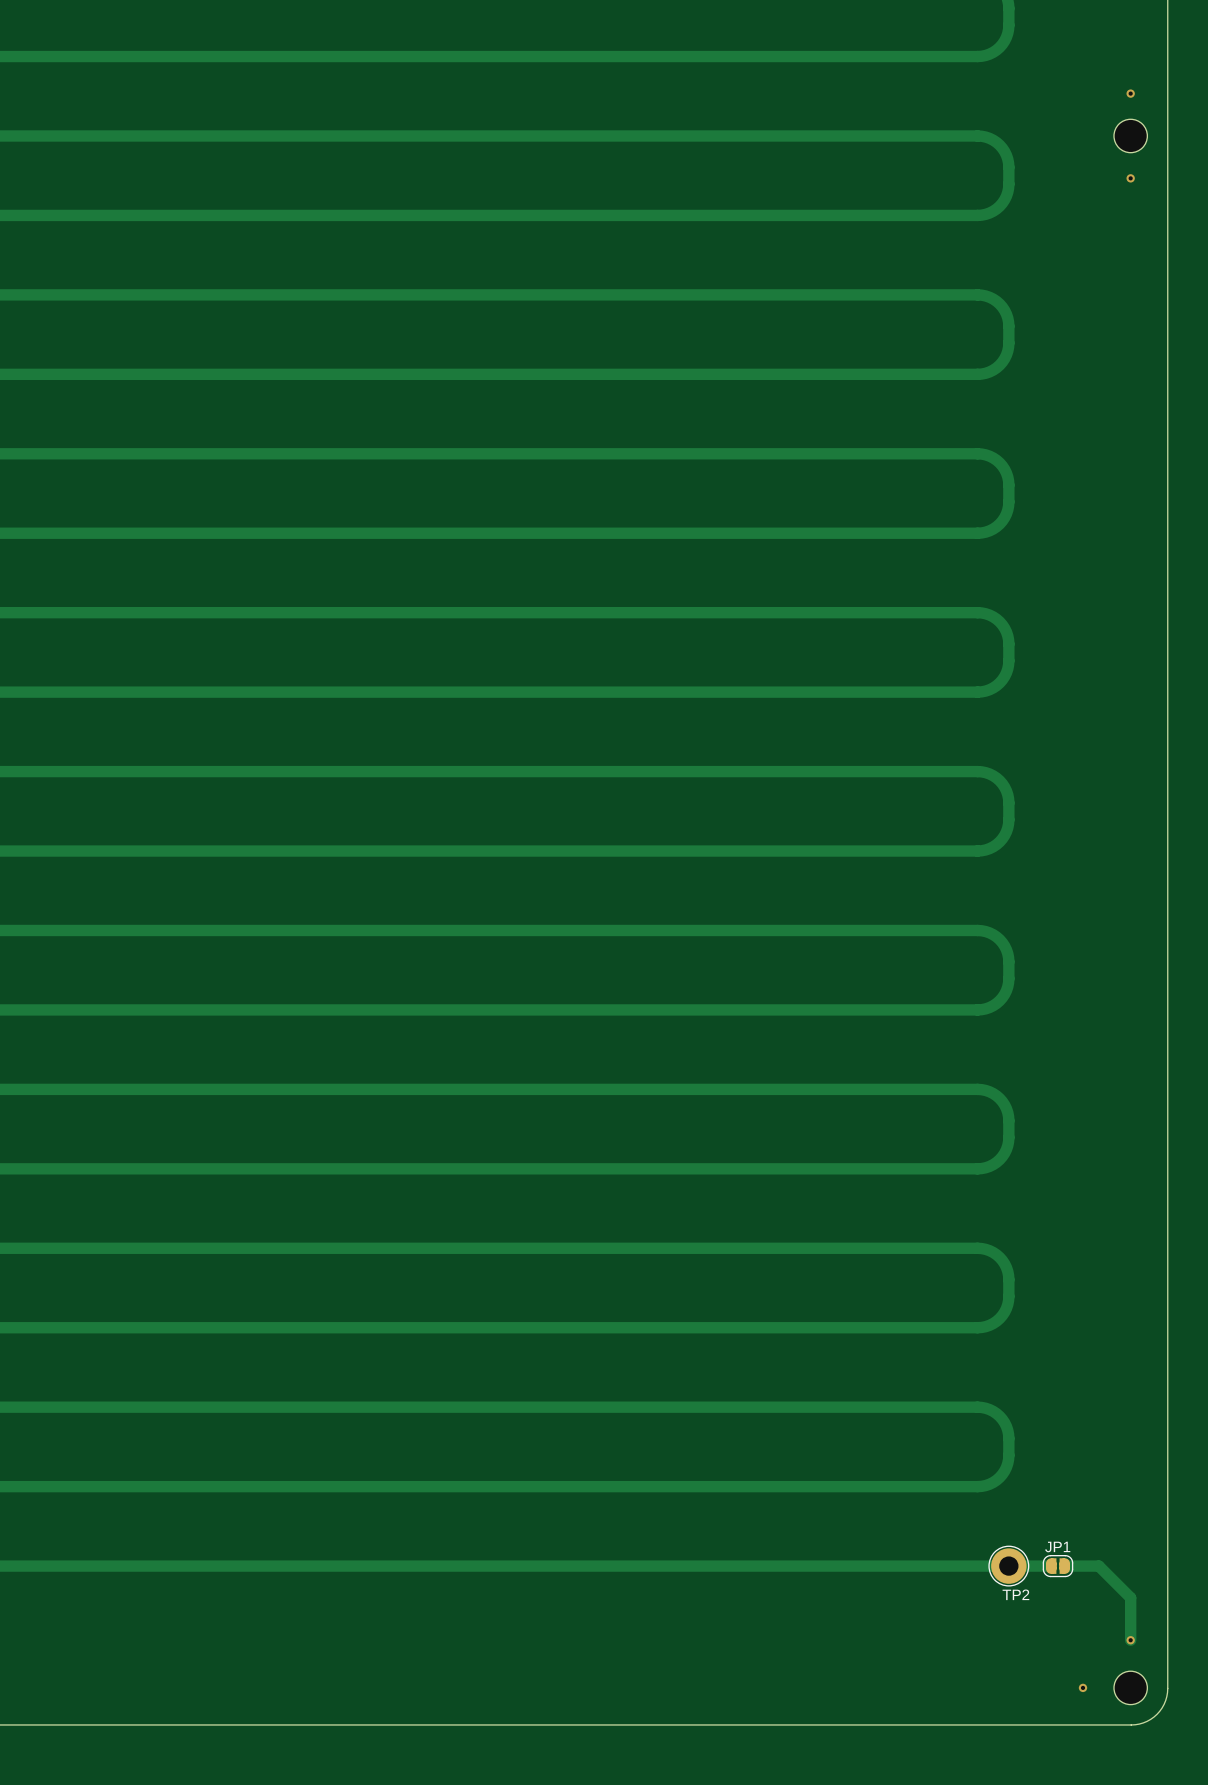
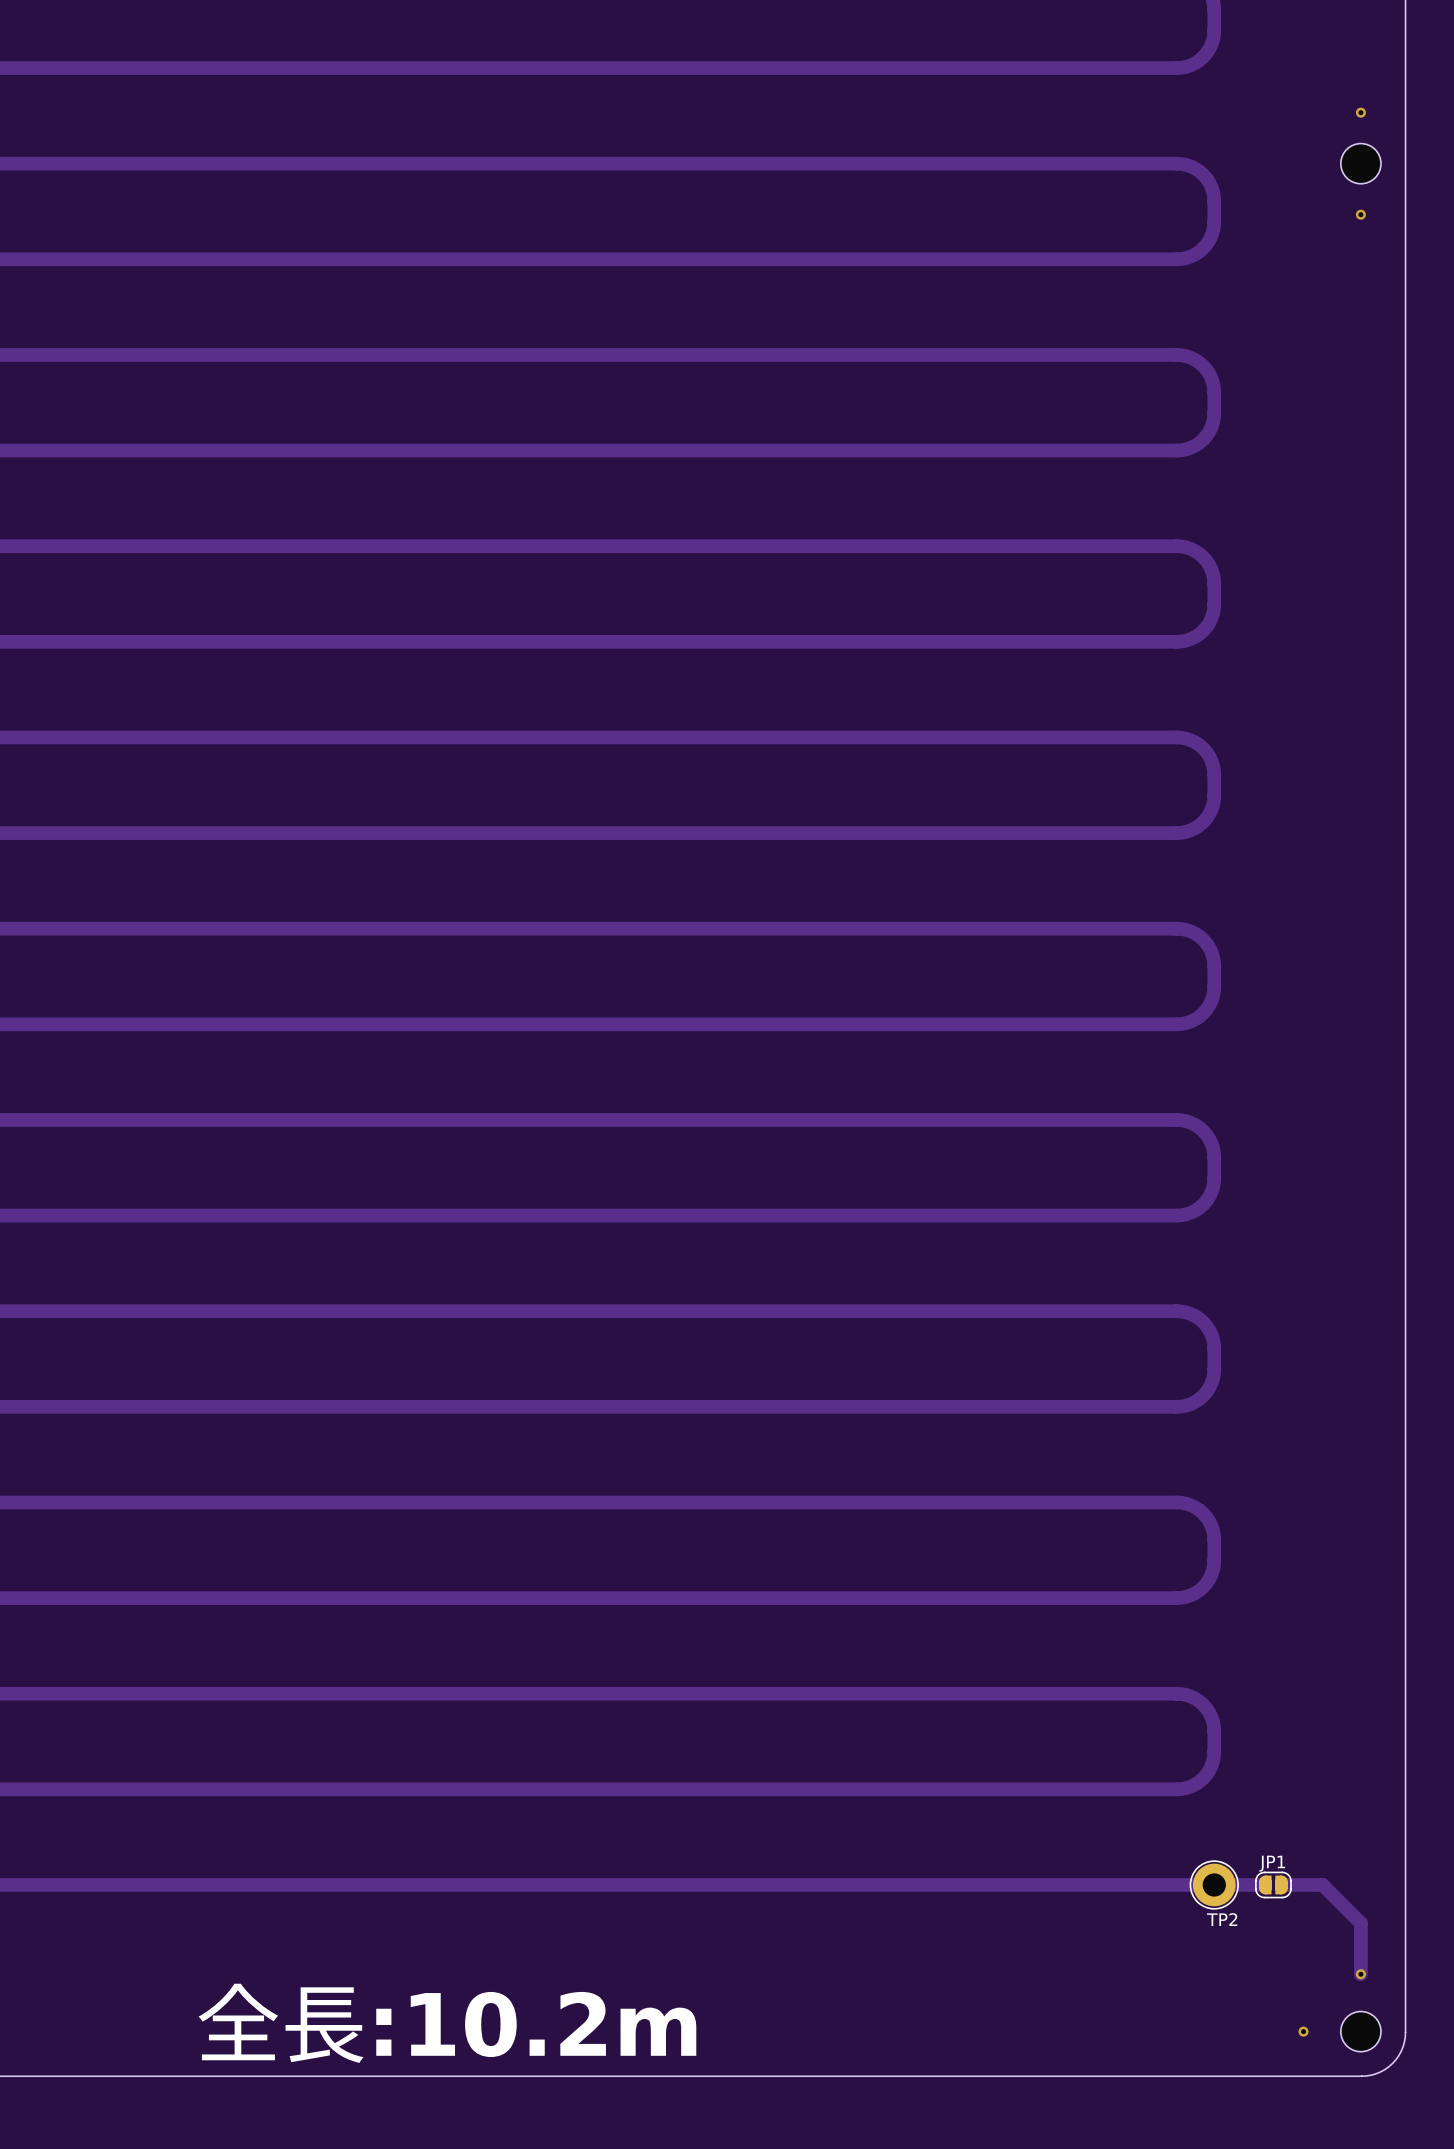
text: none -> 全長:10.2m (447, 2023)

